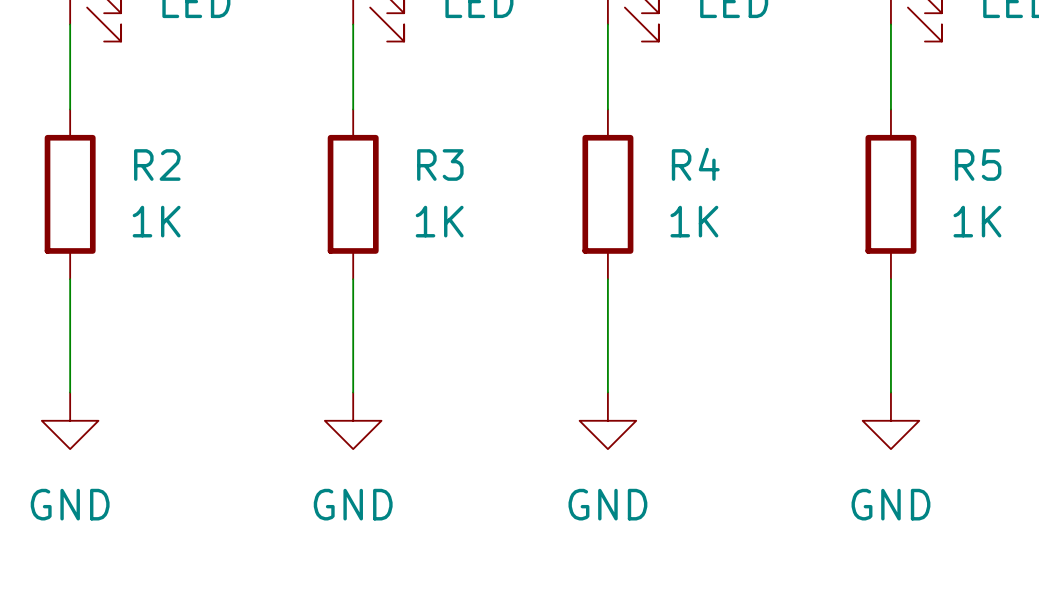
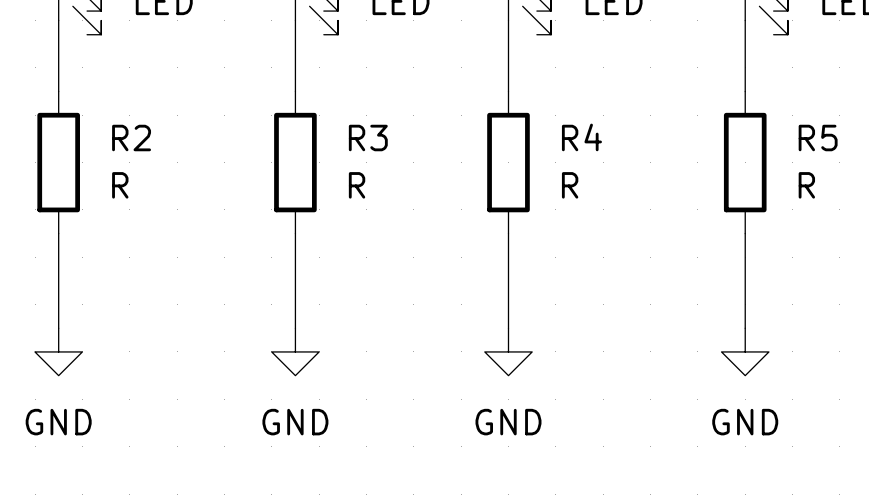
R2 value: 1K (156, 221) -> R (120, 185)
R3 value: 1K (439, 221) -> R (357, 185)
R4 value: 1K (694, 221) -> R (570, 185)
R5 value: 1K (977, 221) -> R (806, 185)

